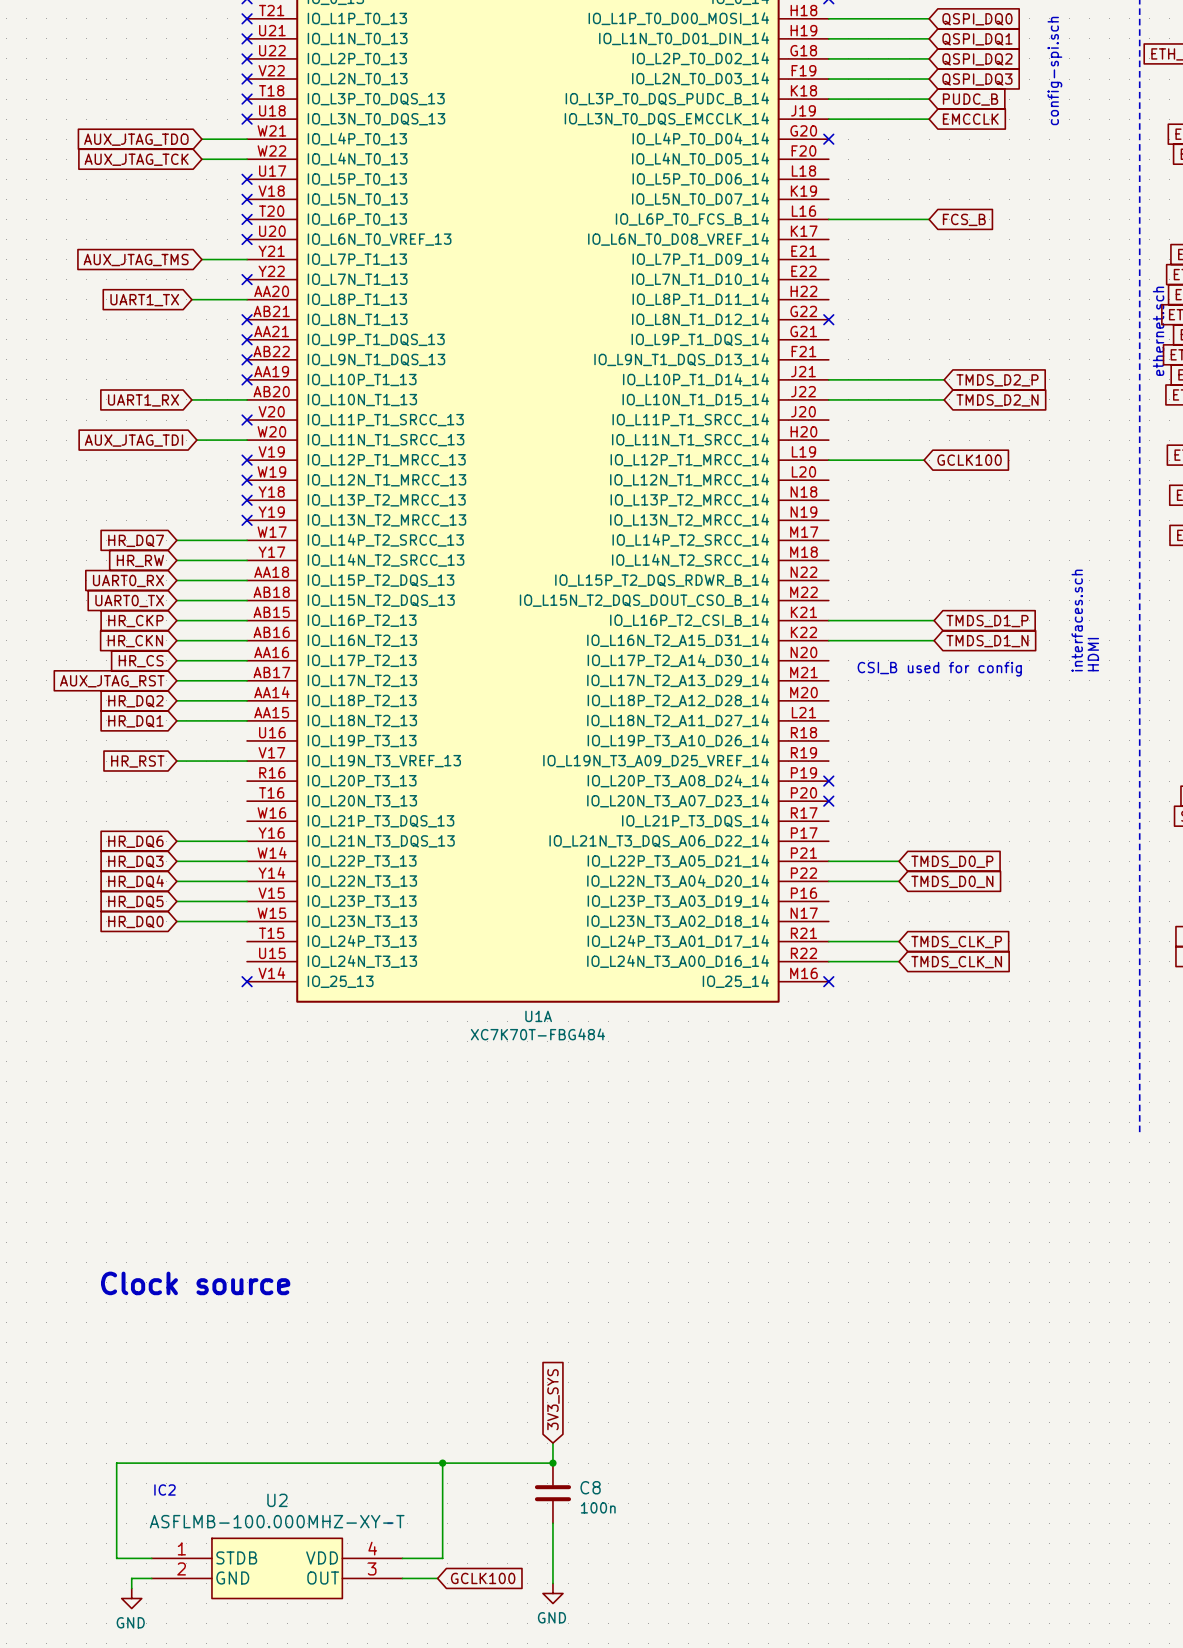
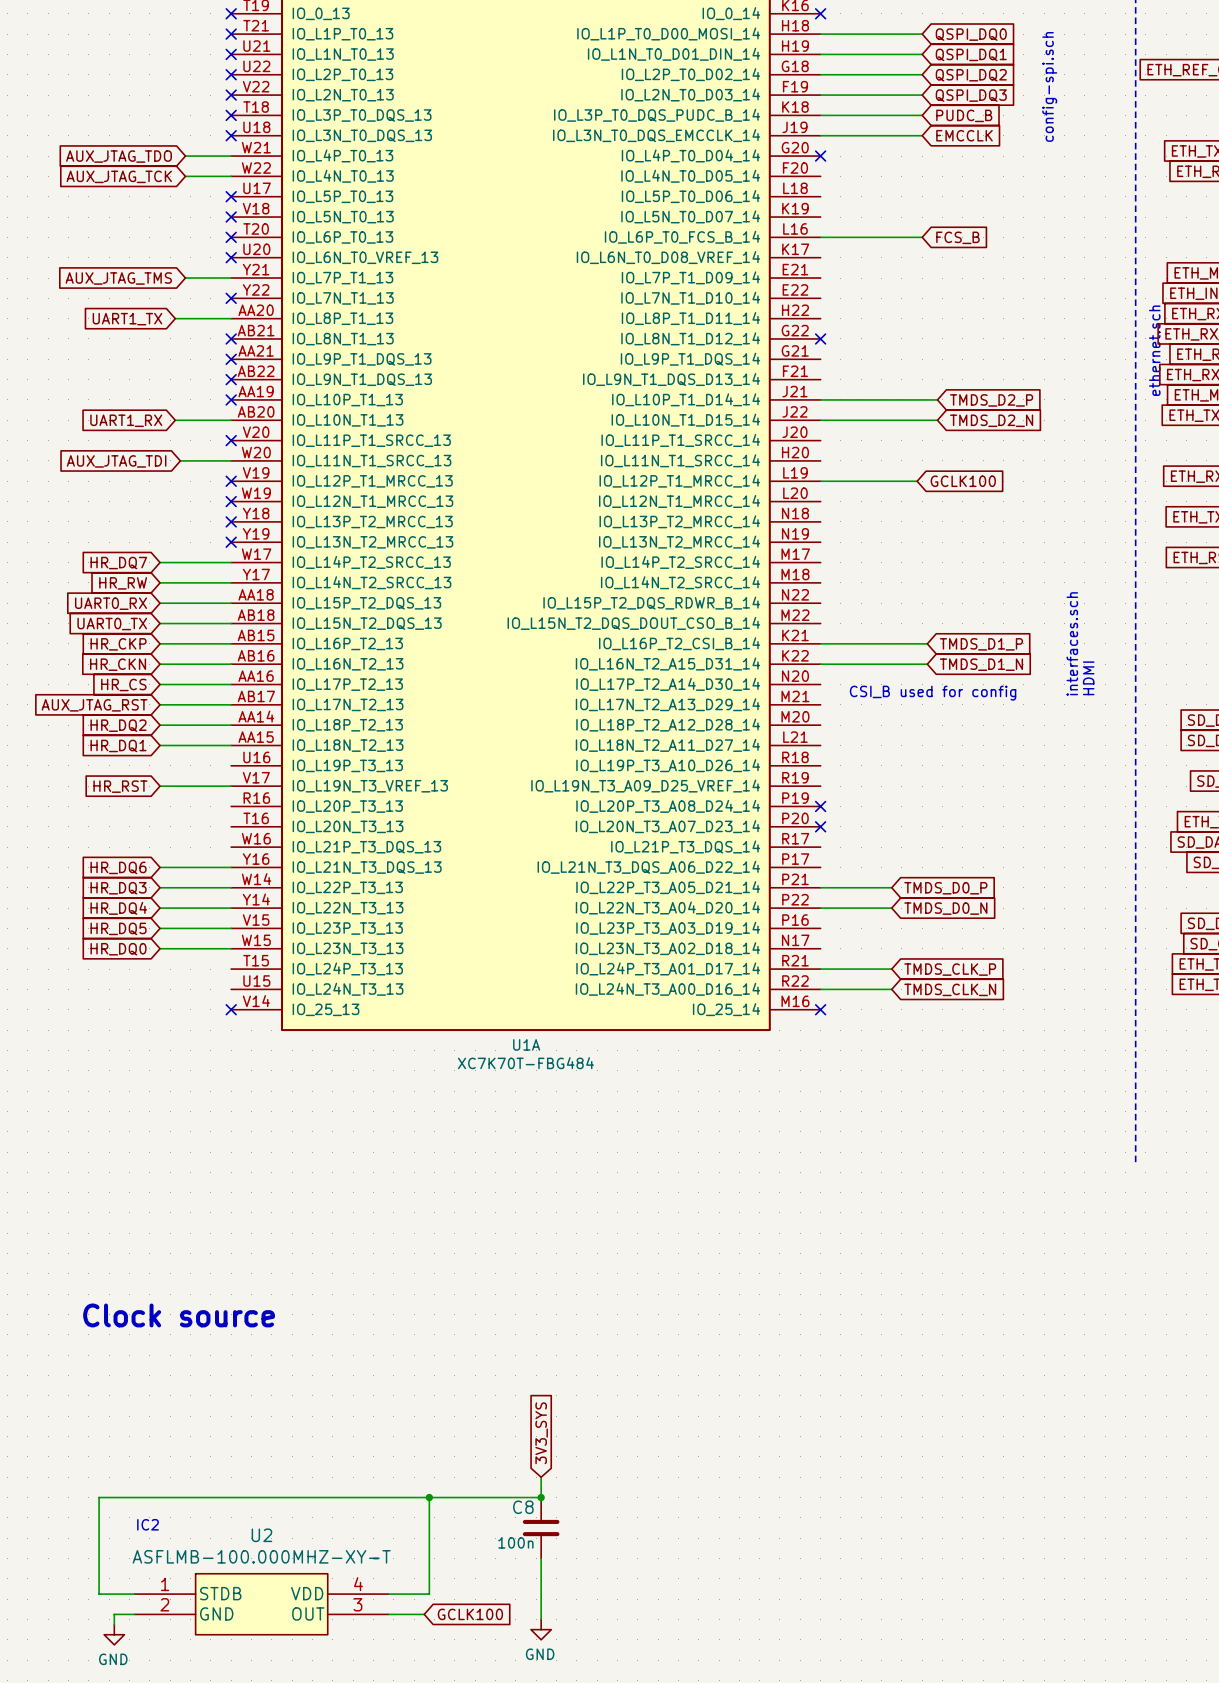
C8 name position: C8 (590, 1487) -> C8 (523, 1507)
C8 text position: 100n (598, 1507) -> 100n (515, 1542)

